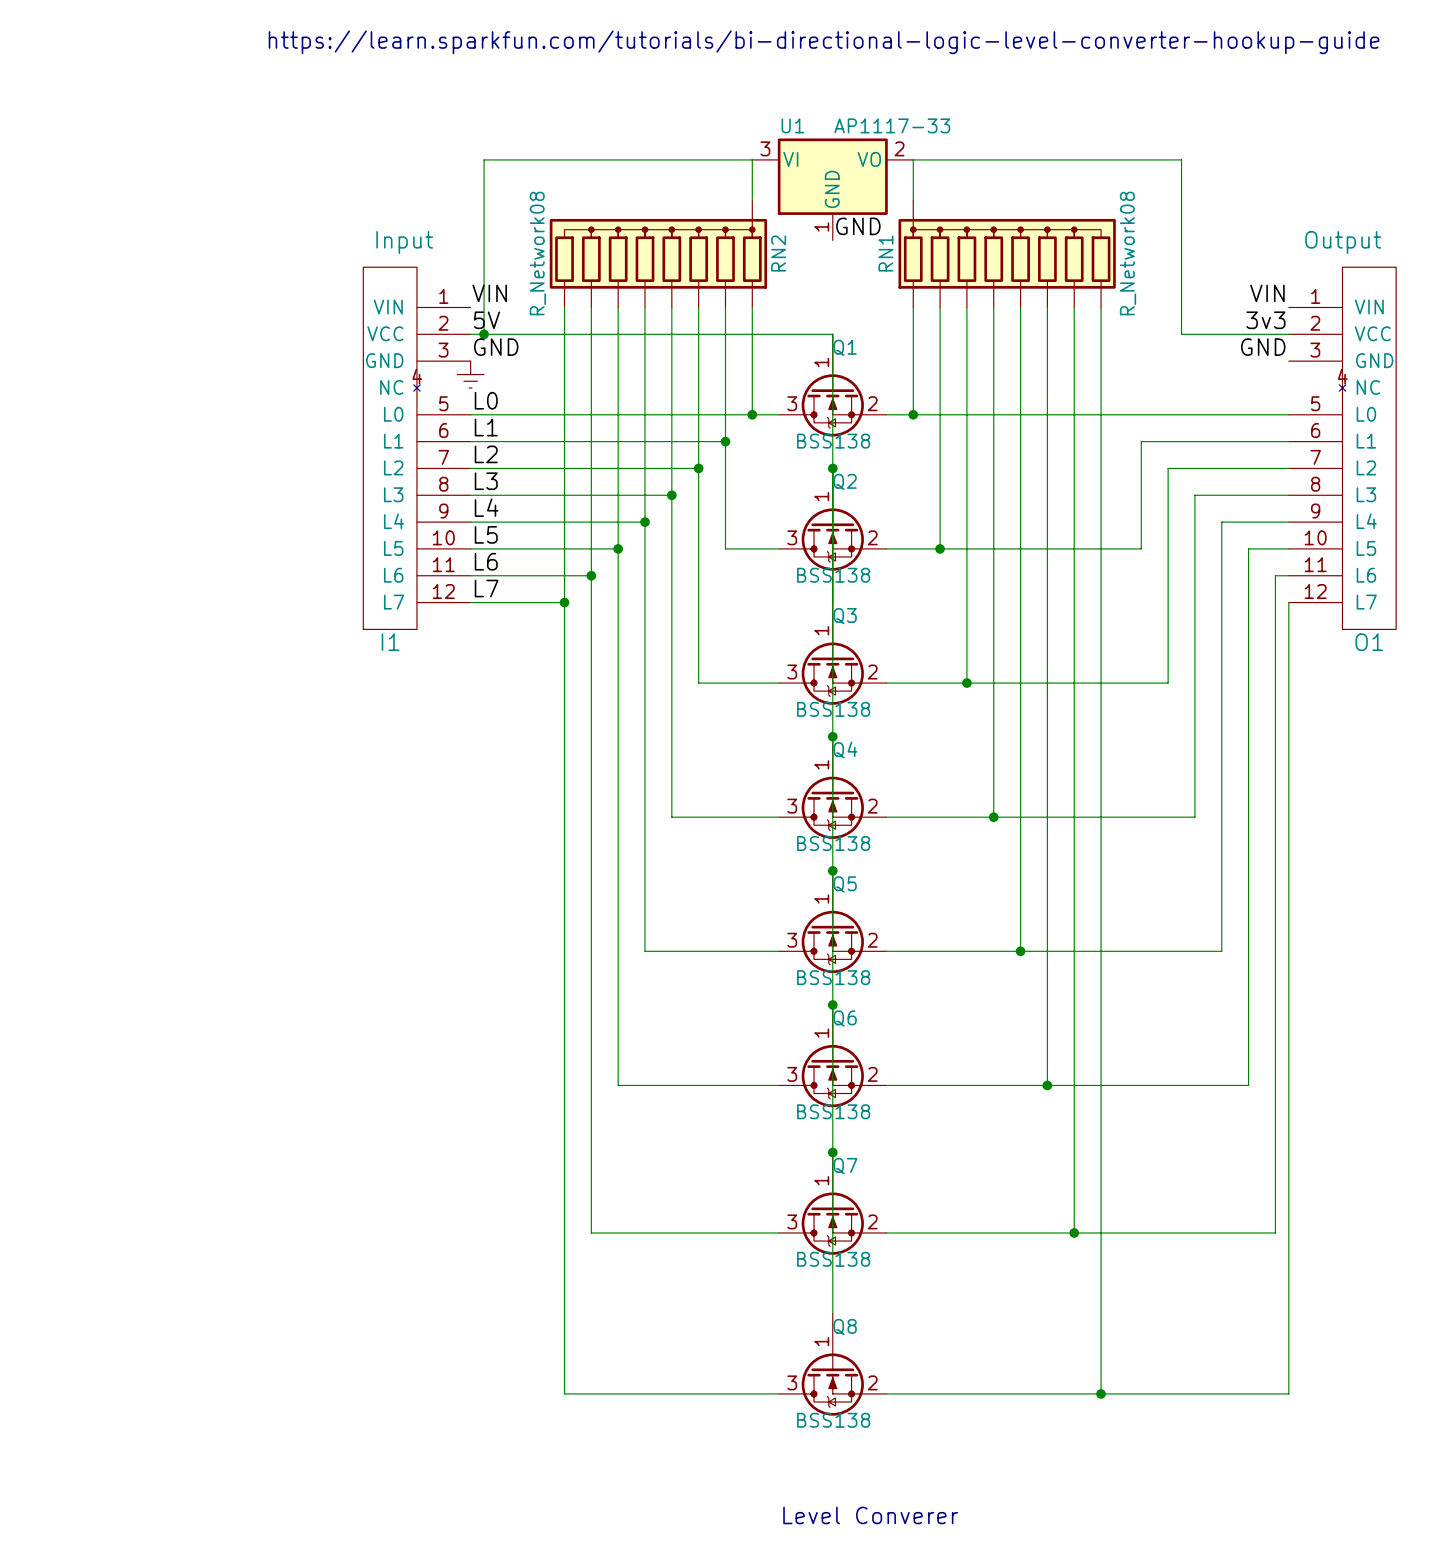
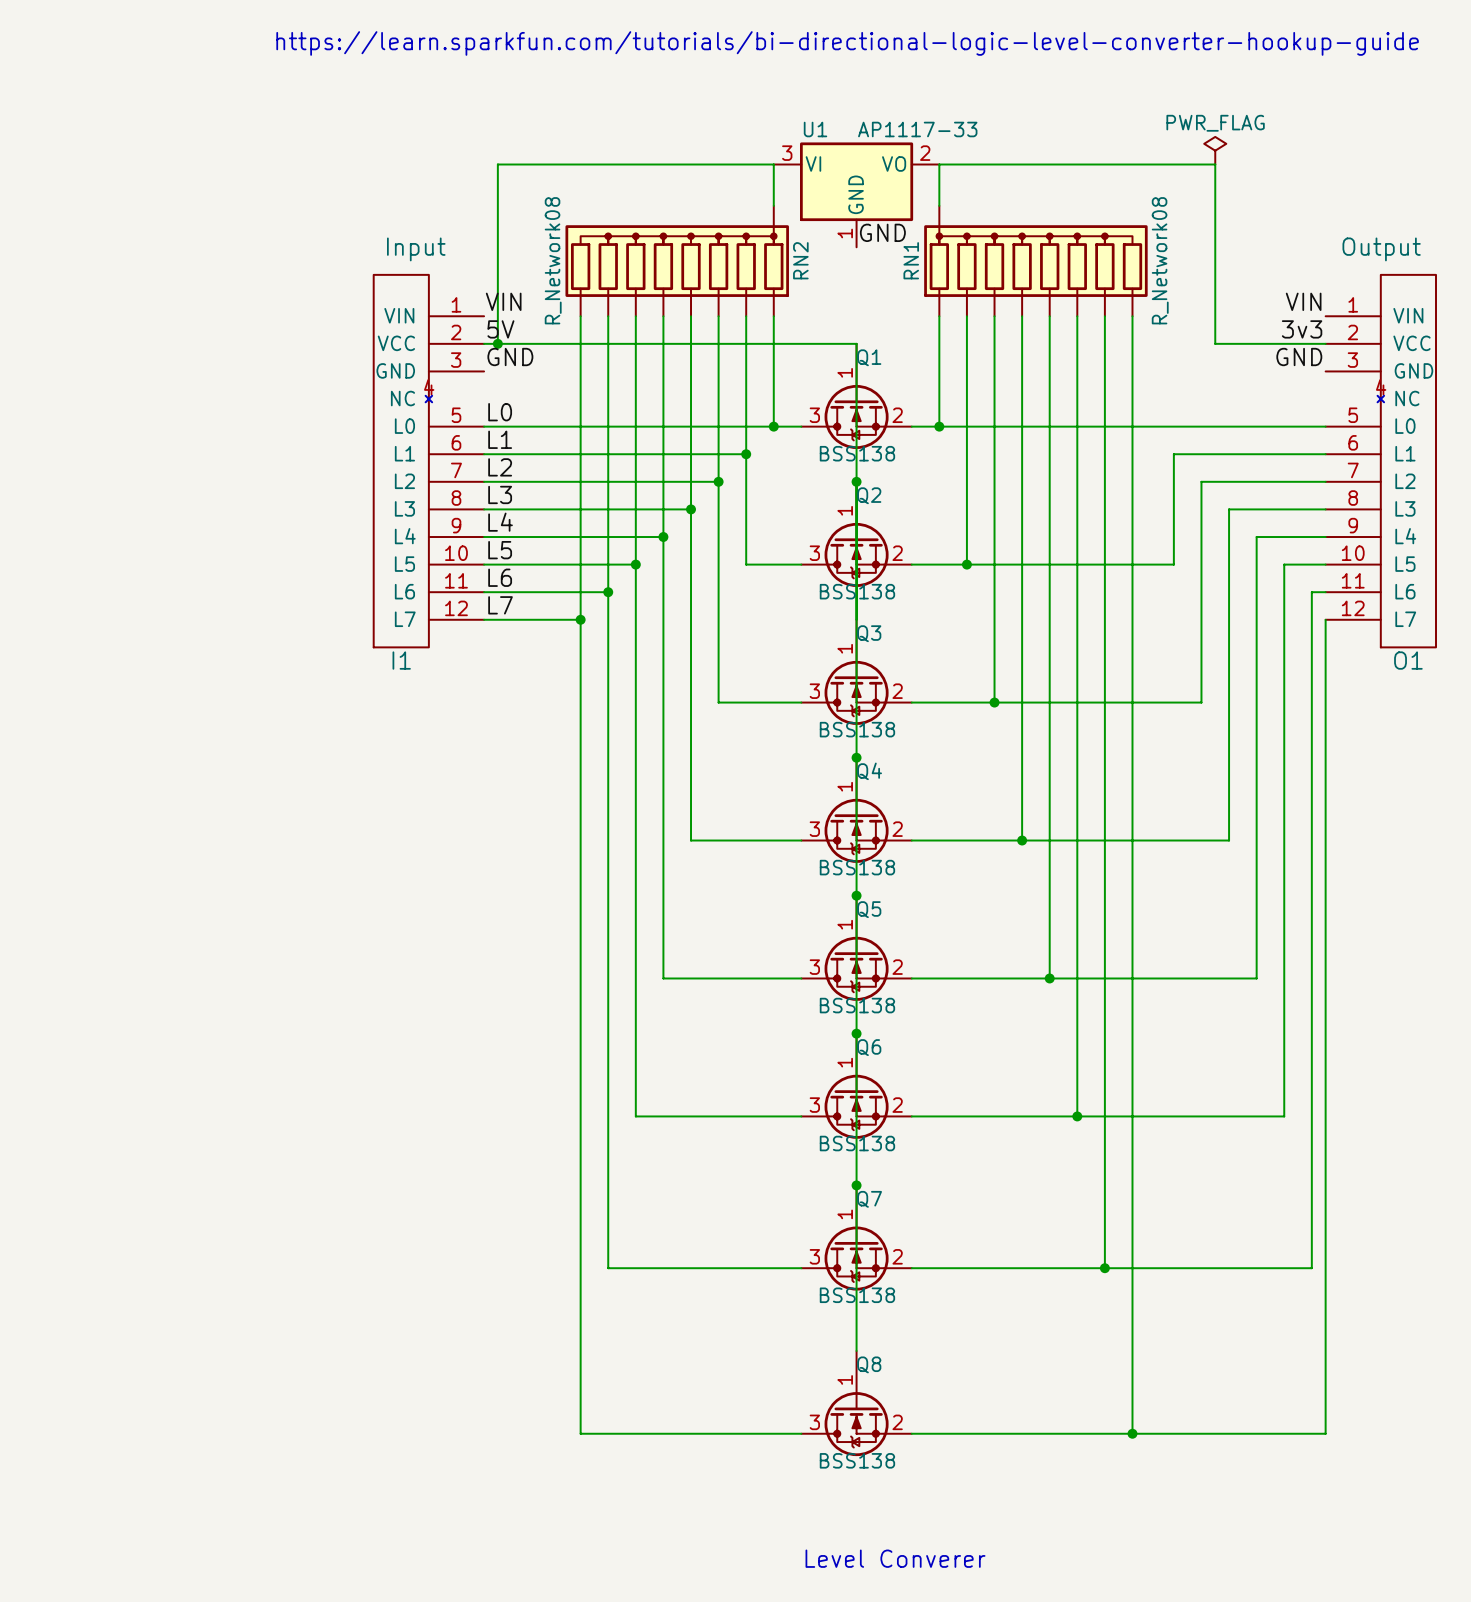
power symbol: none -> PWR_FLAG (1215, 150)
power symbol: (470, 374) -> none

